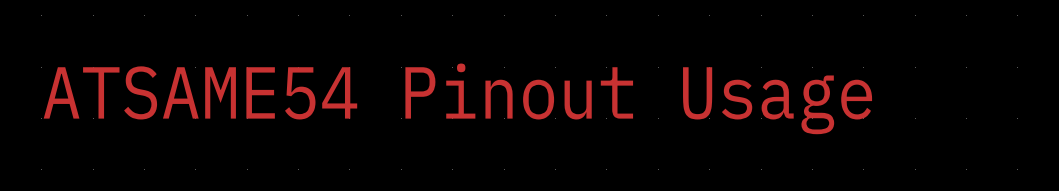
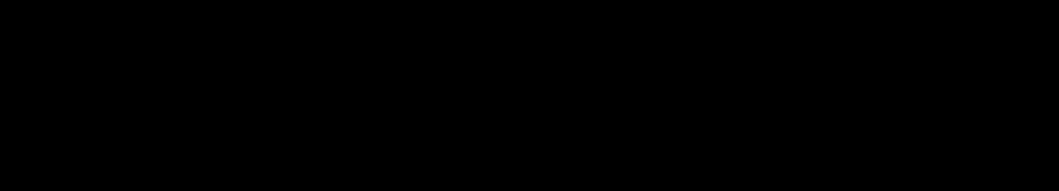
text: ATSAME54 Pinout Usage (457, 98) -> none

